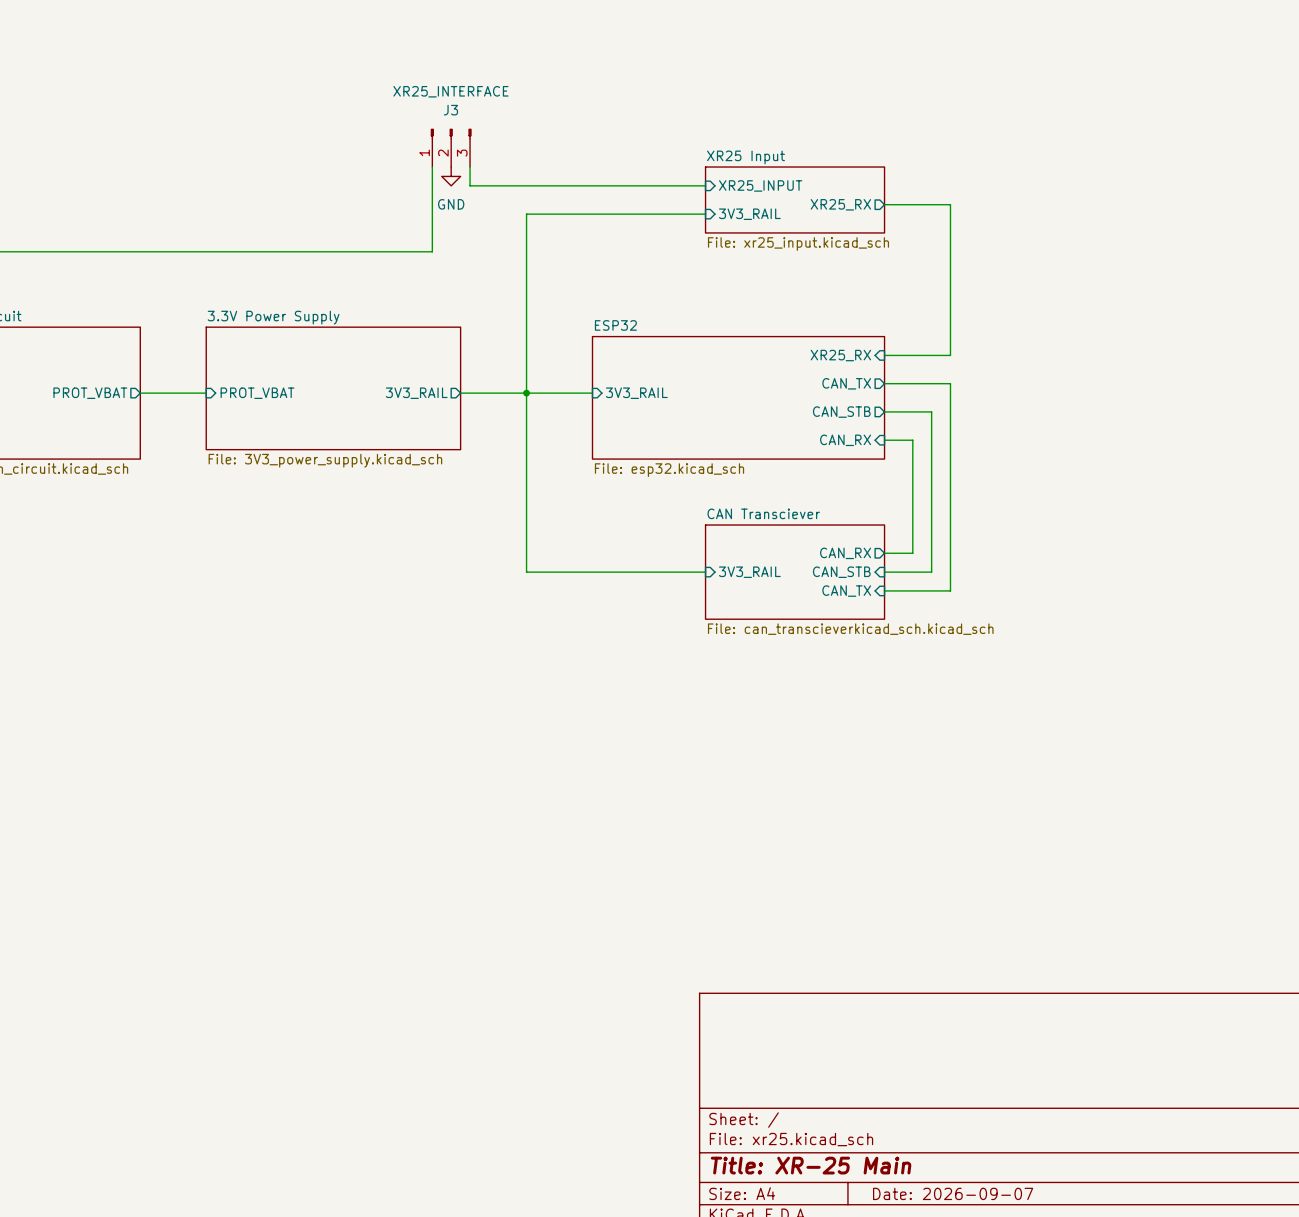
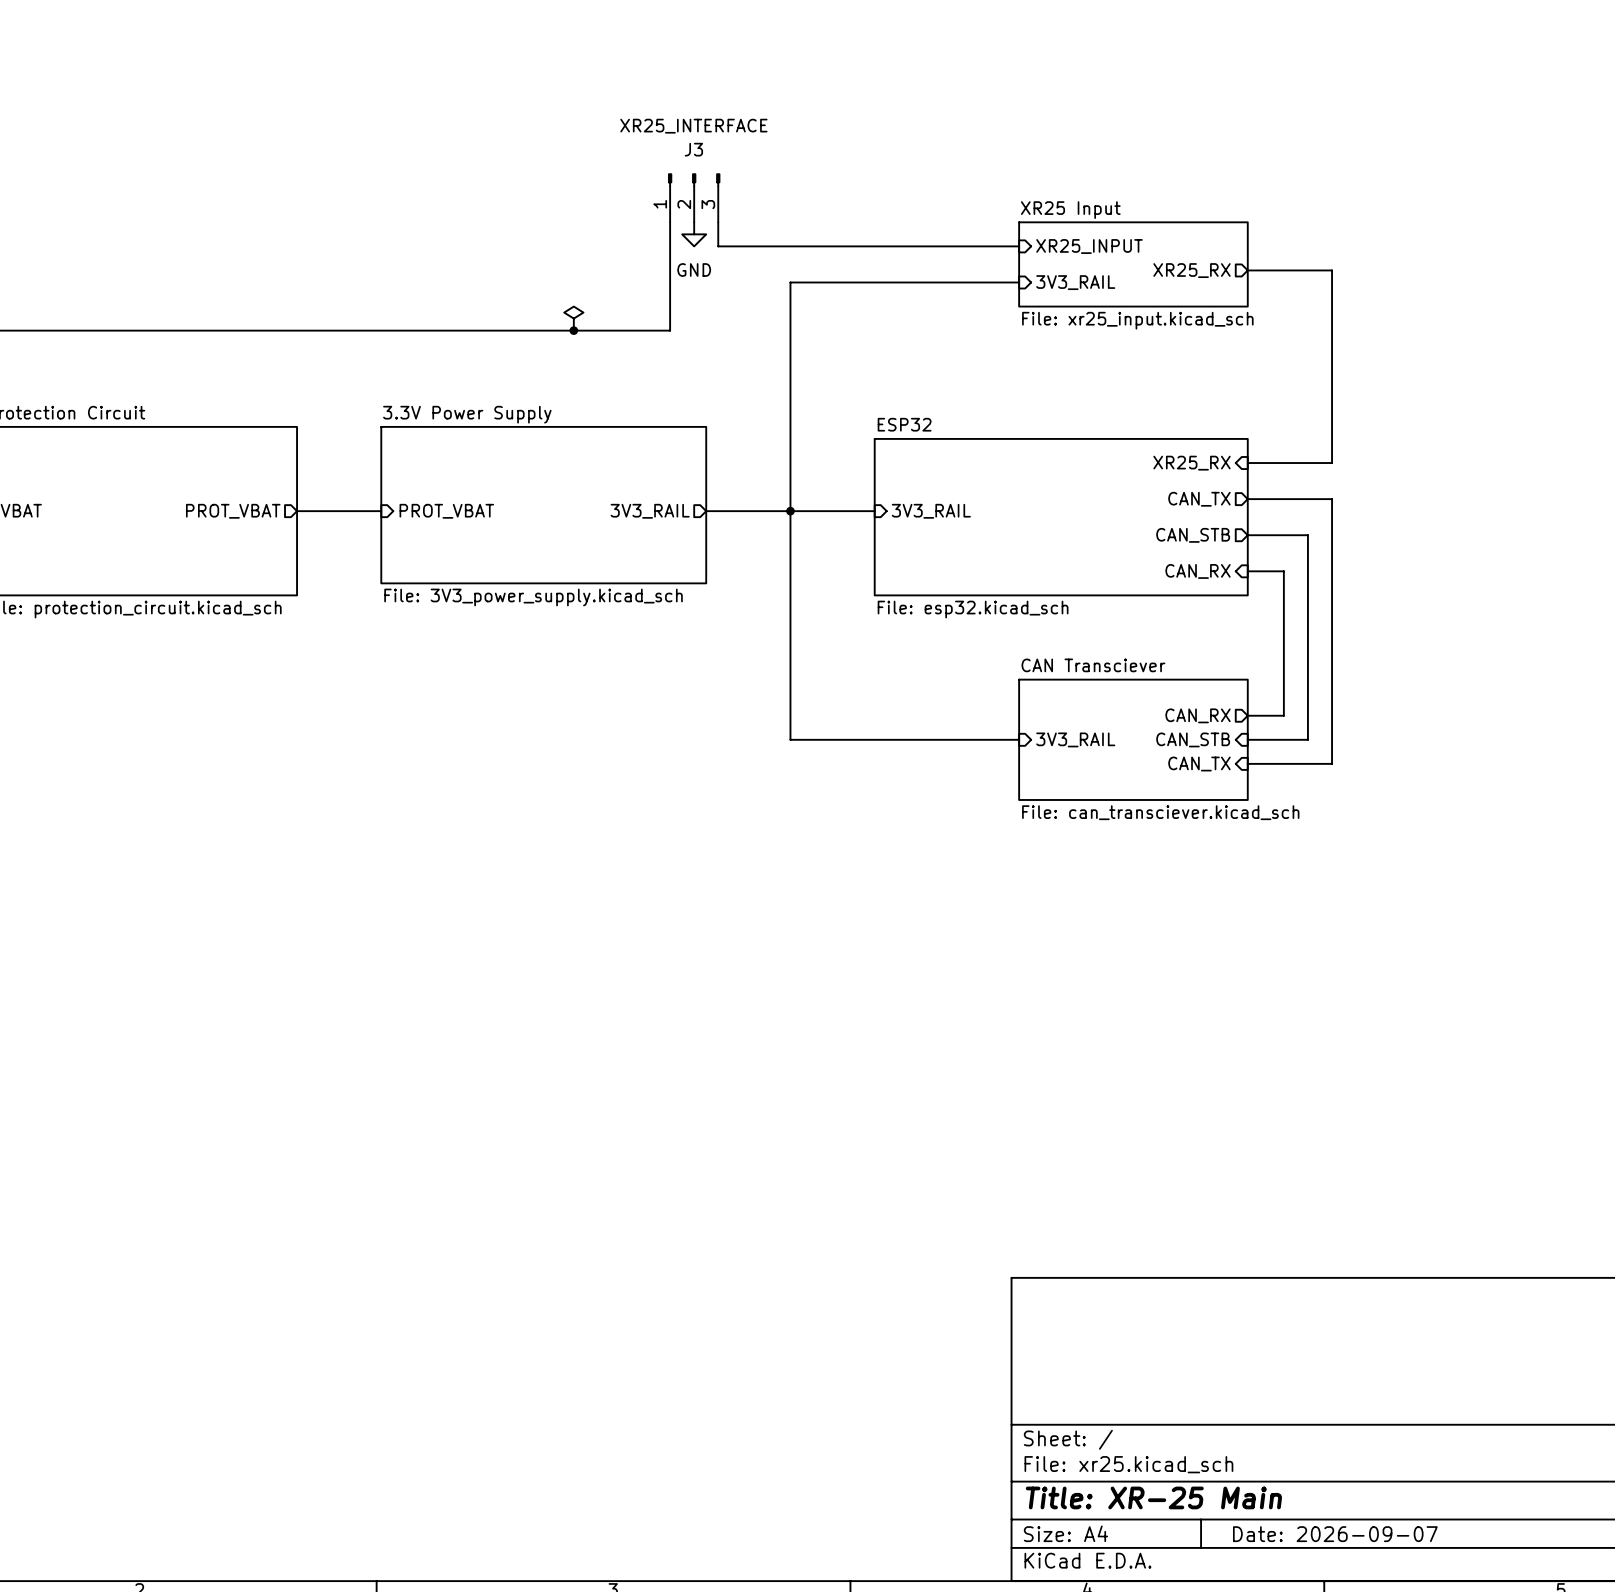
power symbol: none -> (573, 318)
junction: none -> (573, 330)
sheet CAN Transciever value: File: can_transcieverkicad_sch.kicad_sch (850, 629) -> File: can_transciever.kicad_sch (1160, 812)

